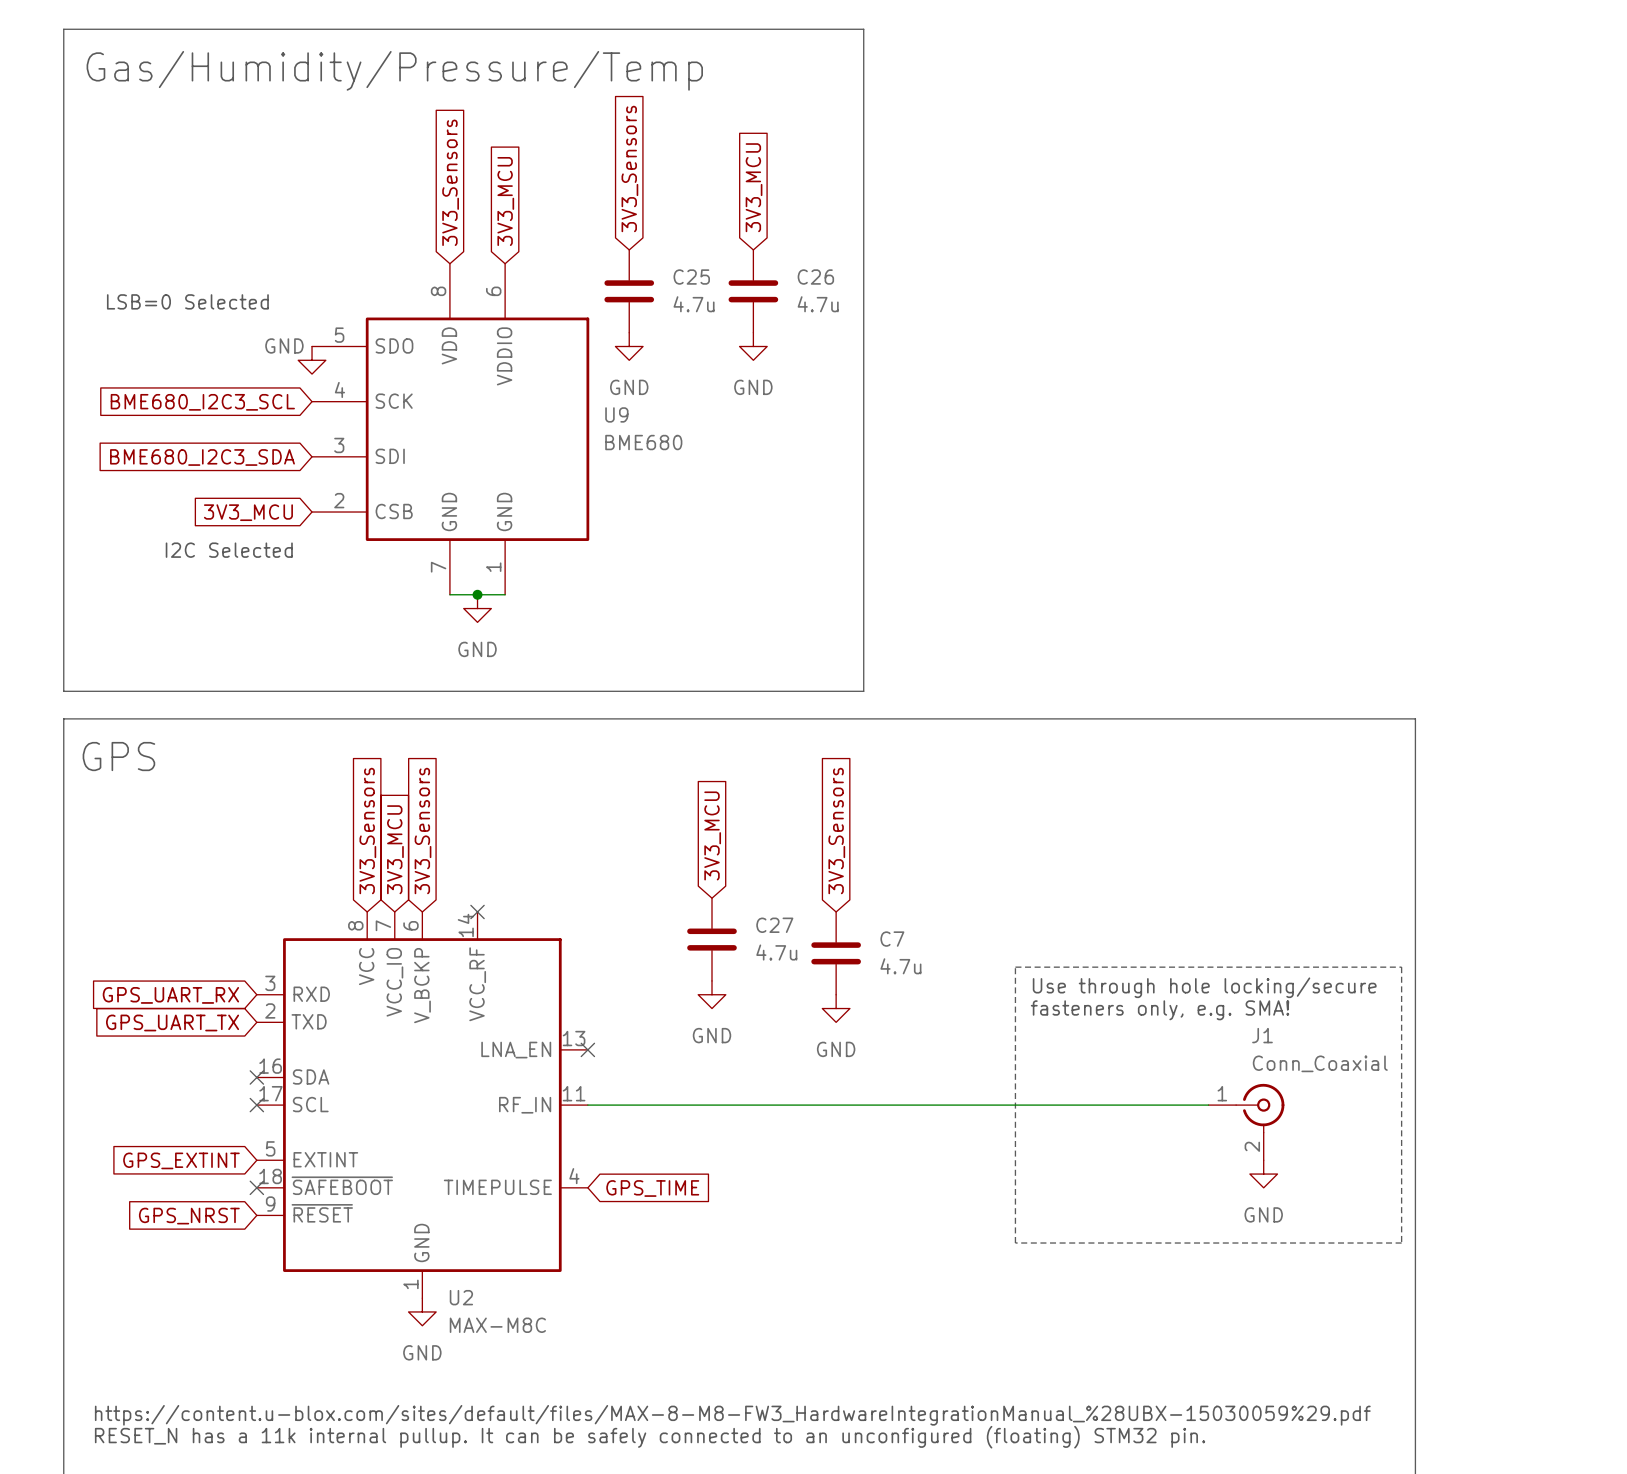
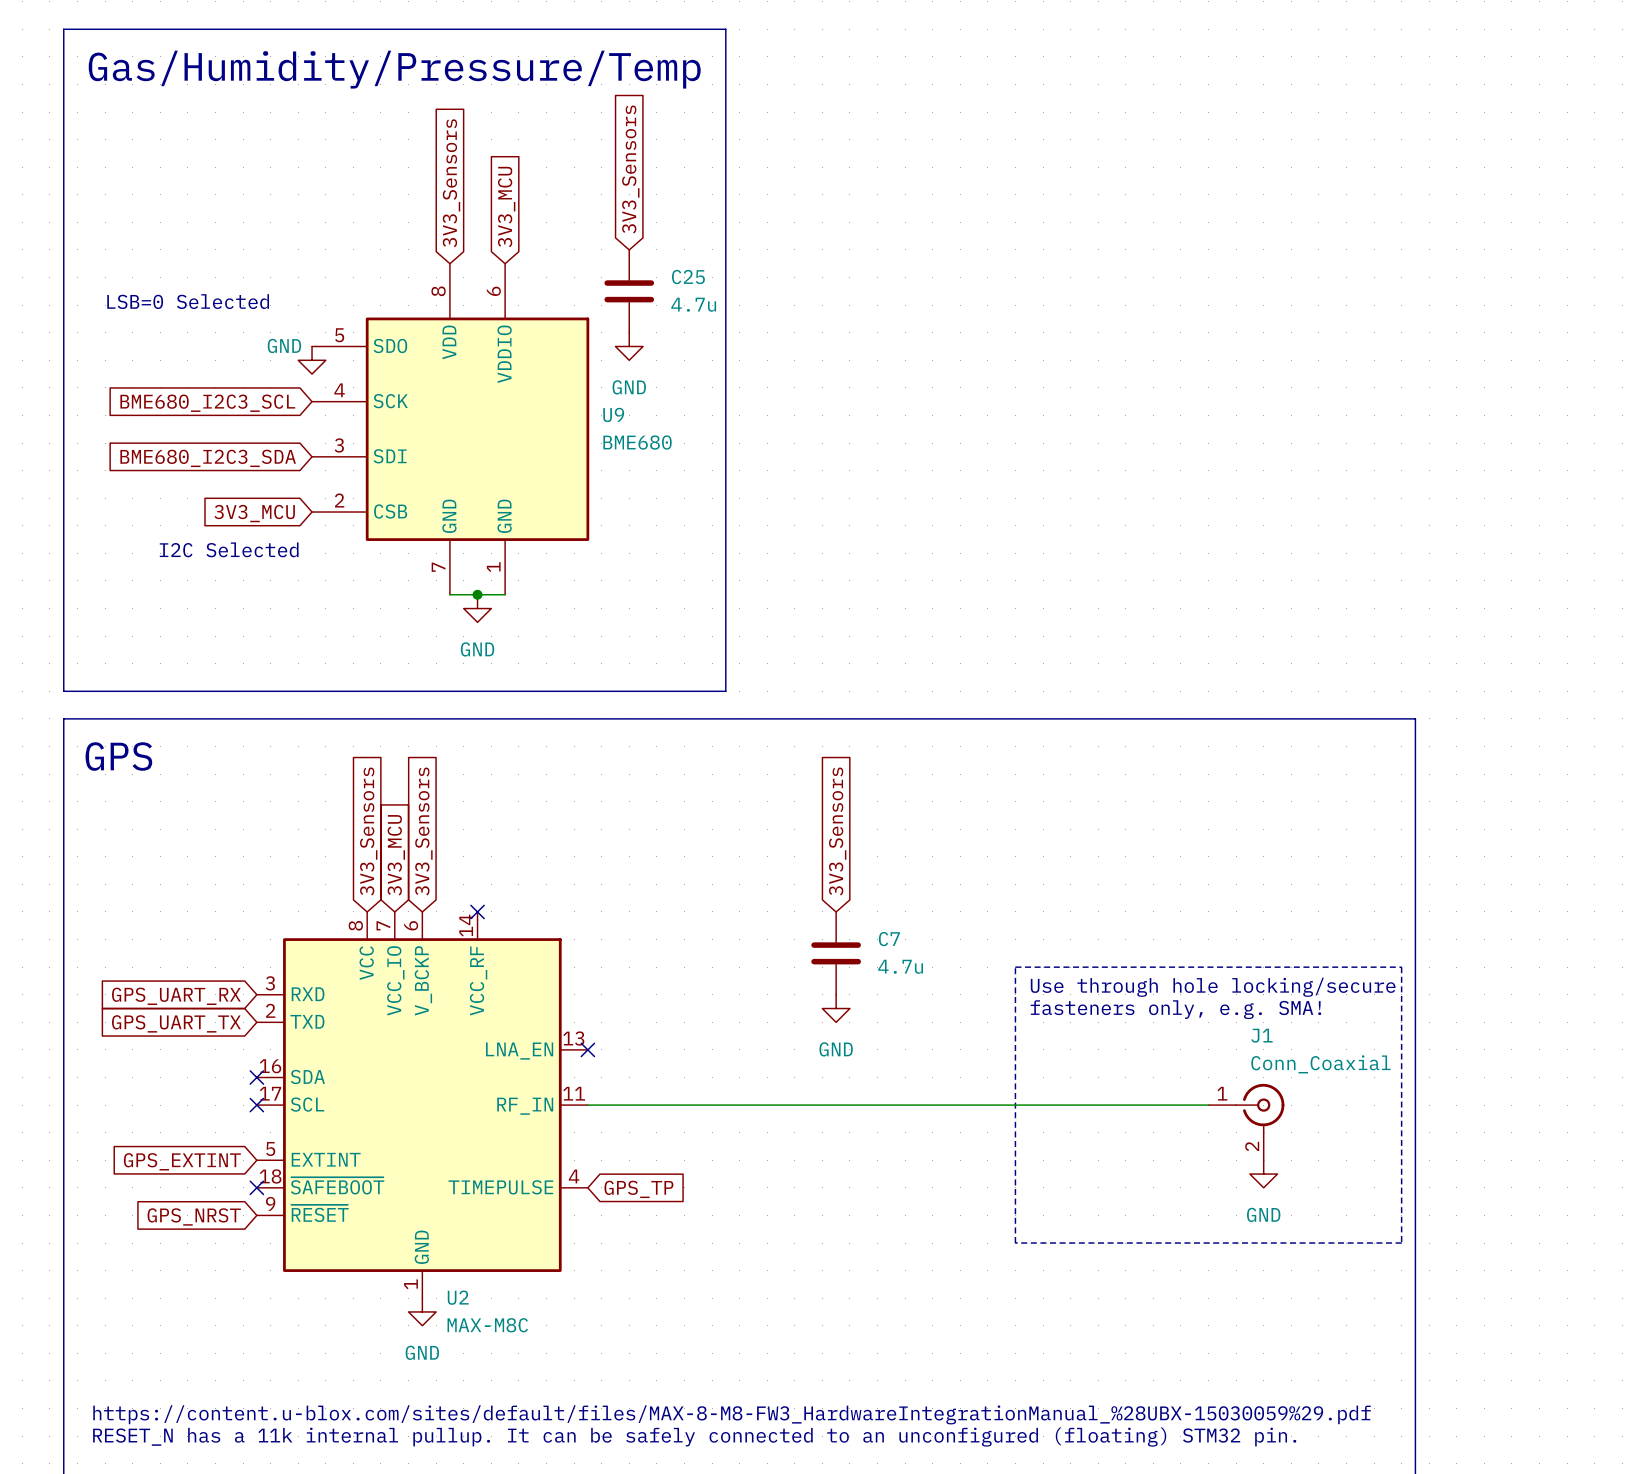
line: (725, 29) (863, 29) (863, 691) (725, 691) -> (725, 29) (725, 691)
global label: 3V3_MCU (754, 187) -> none
C26: 4.7u (753, 291) -> none
power symbol: GND (753, 346) -> none
global label: 3V3_MCU (712, 835) -> none
C27: 4.7u (712, 939) -> none
power symbol: GND (712, 994) -> none
global label: GPS_TIME (652, 1188) -> GPS_TP (638, 1189)

